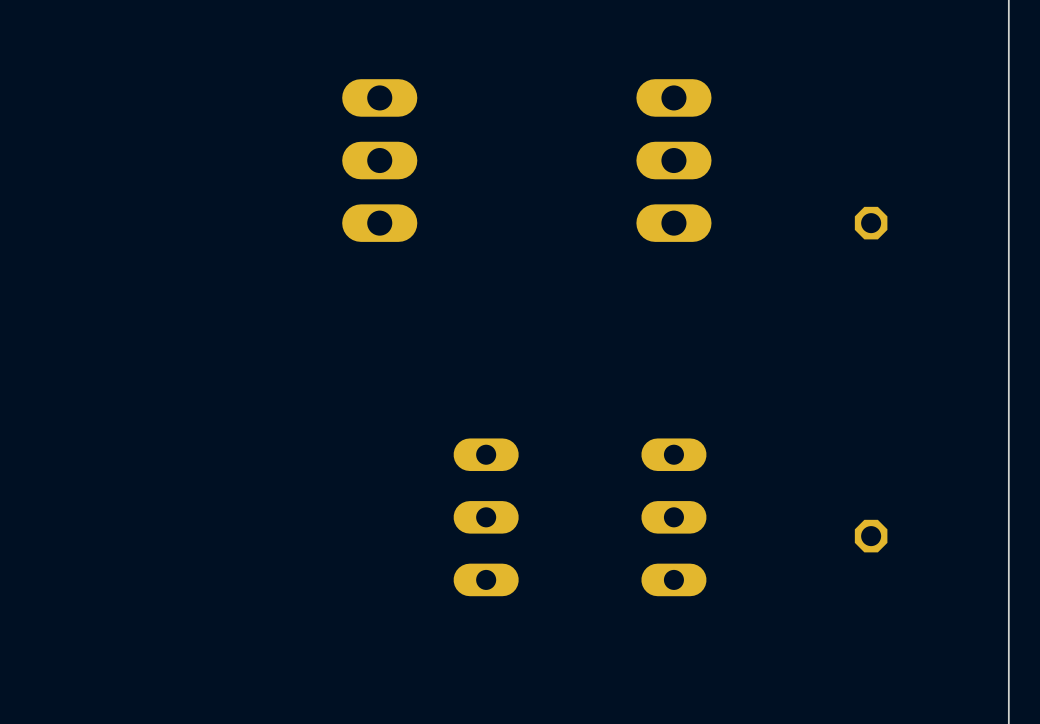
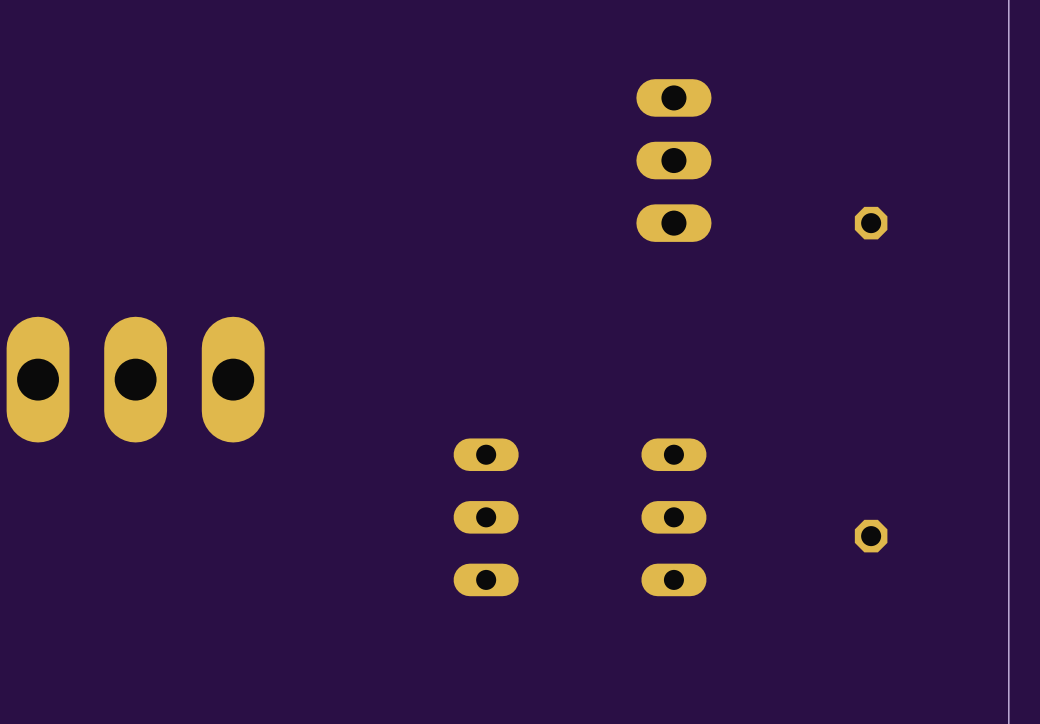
part: (379, 160) -> none
part: none -> (135, 379)

